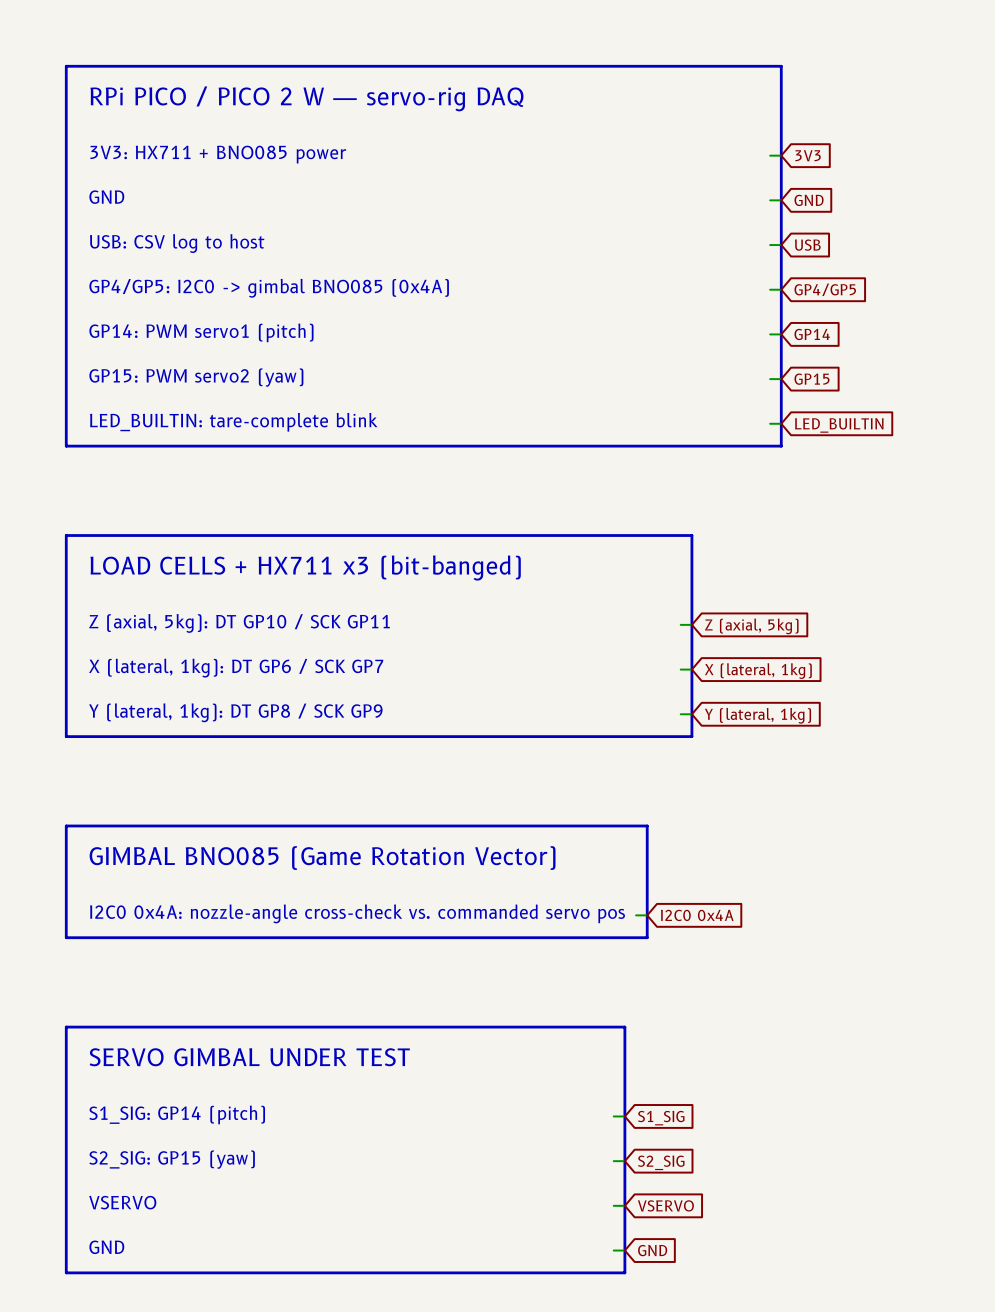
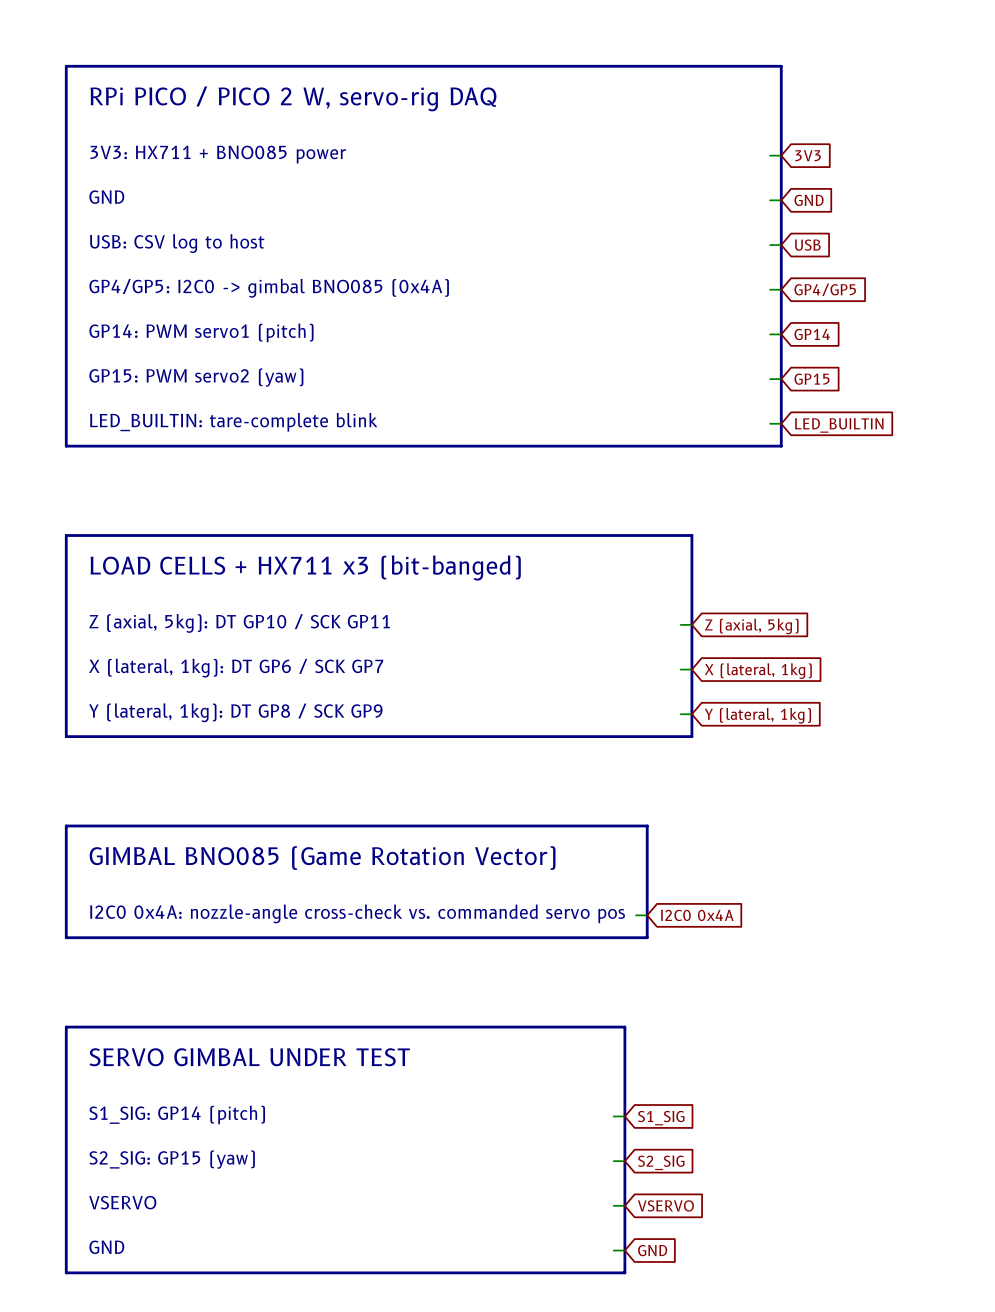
text: RPi PICO / PICO 2 W — servo-rig DAQ (306, 98) -> RPi PICO / PICO 2 W, servo-rig DAQ (293, 98)

